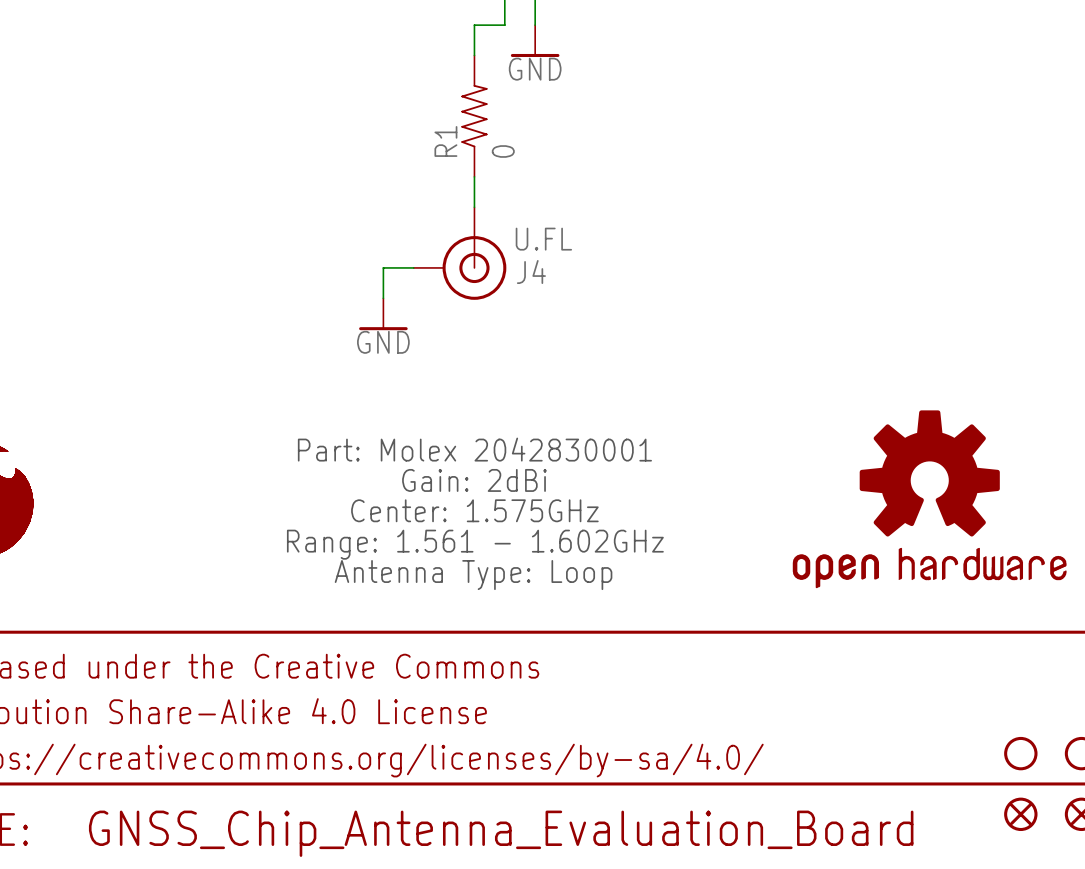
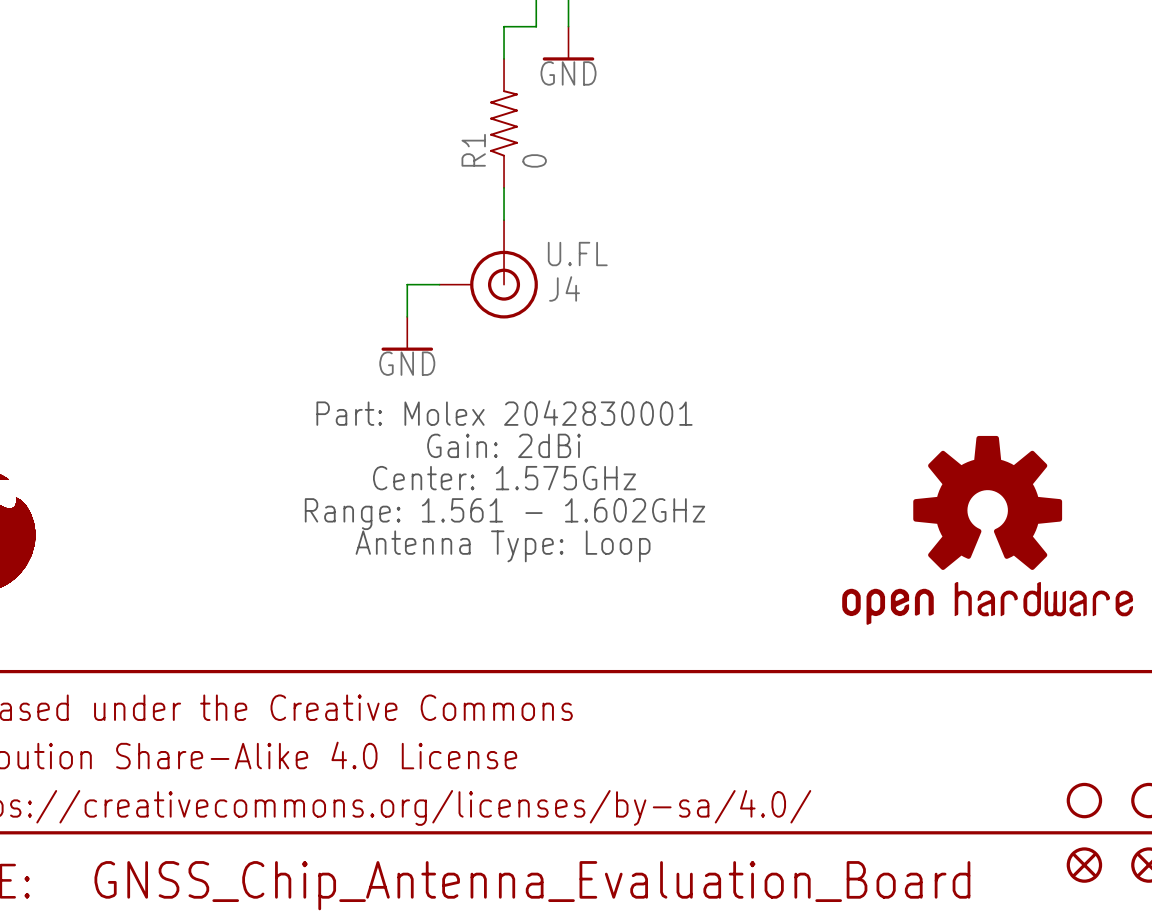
text: none -> Part: Molex 2042830001 (504, 413)
text: none -> Gain: 2dBi (504, 445)
text: Part: Molex 2042830001 (474, 449) -> Center: 1.575GHz (504, 478)
text: Gain: 2dBi (474, 480) -> Range: 1.561 - 1.602GHz (504, 514)
text: Center: 1.575GHz (474, 510) -> Antenna Type: Loop (503, 546)
text: Range: 1.561 - 1.602GHz (475, 544) -> none
text: Antenna Type: Loop (473, 575) -> none

